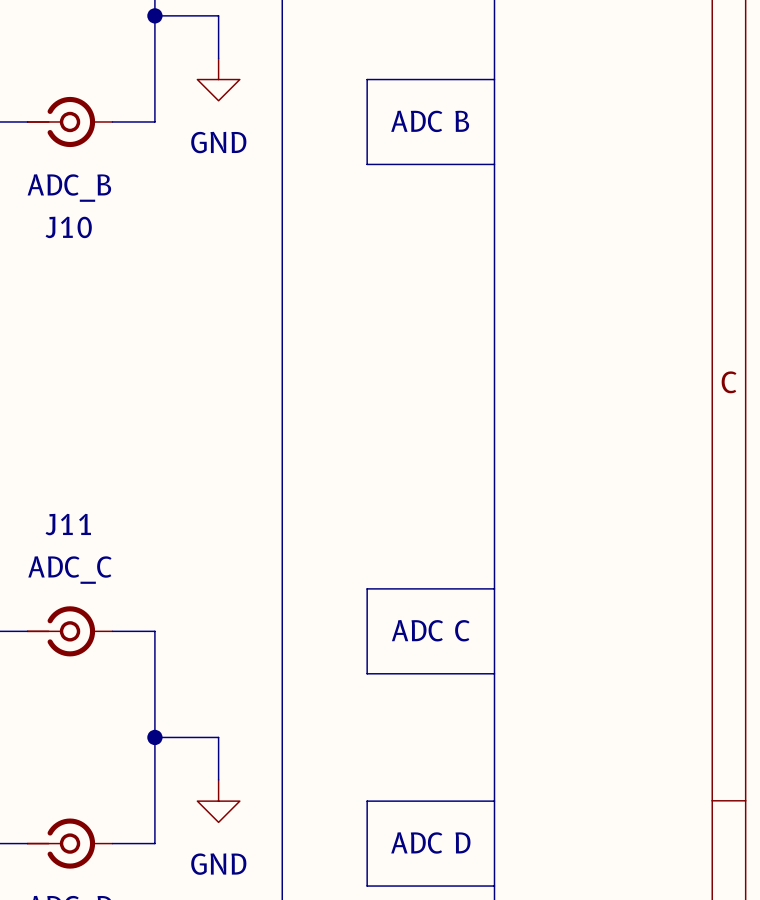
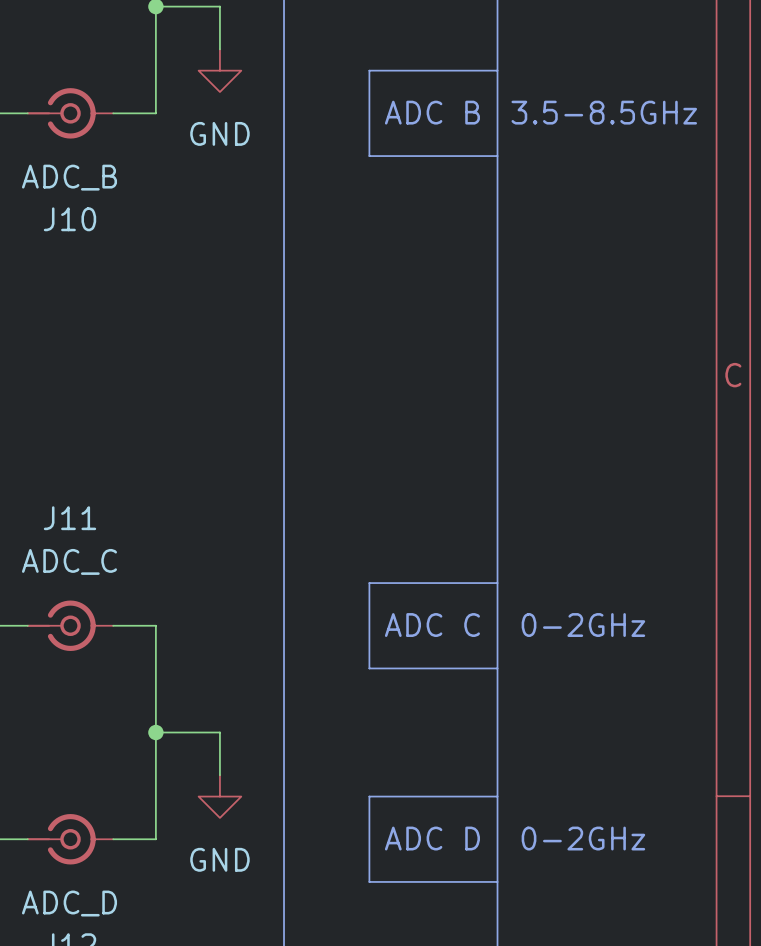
text: none -> 3.5-8.5GHz (604, 112)
text: none -> 0-2GHz (583, 625)
text: none -> 0-2GHz (583, 838)

